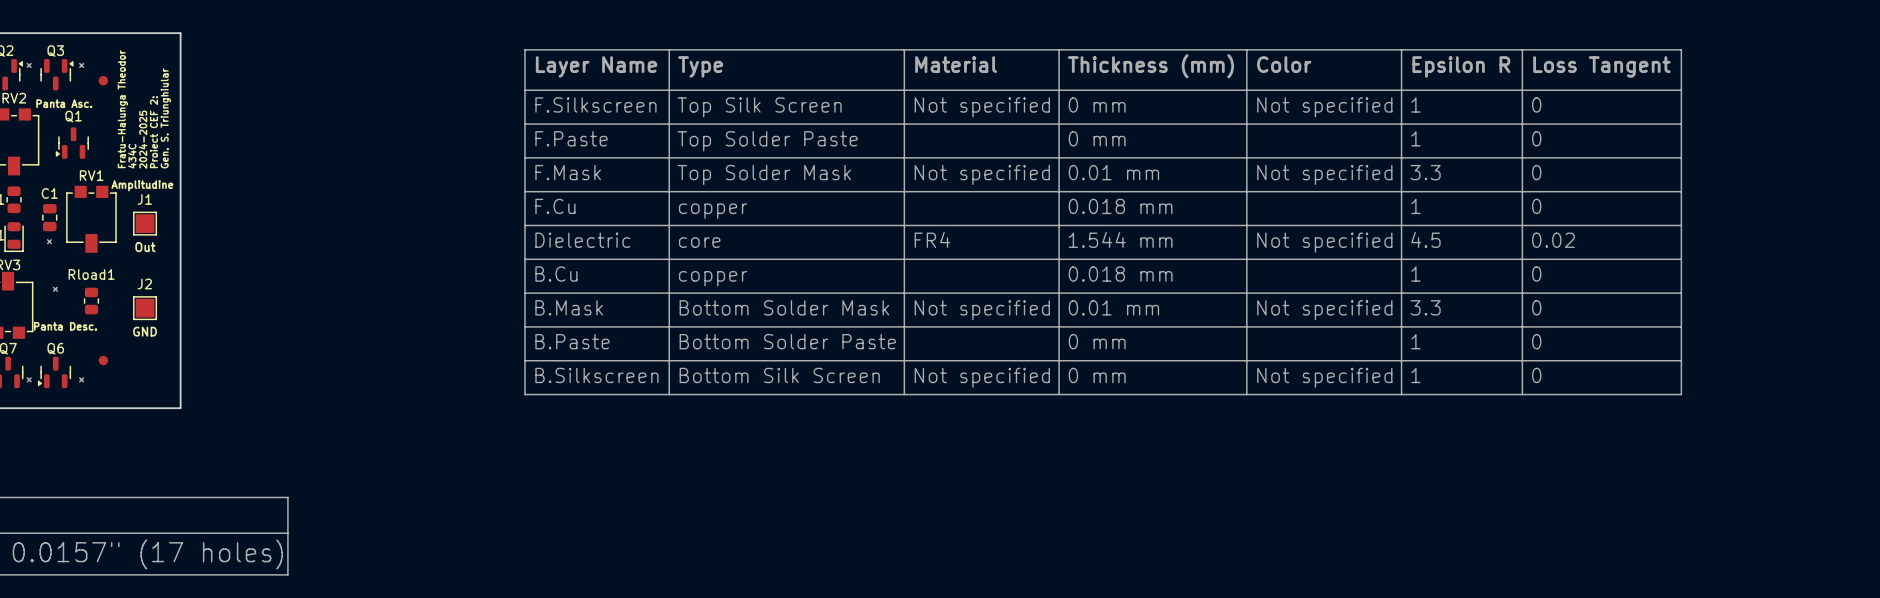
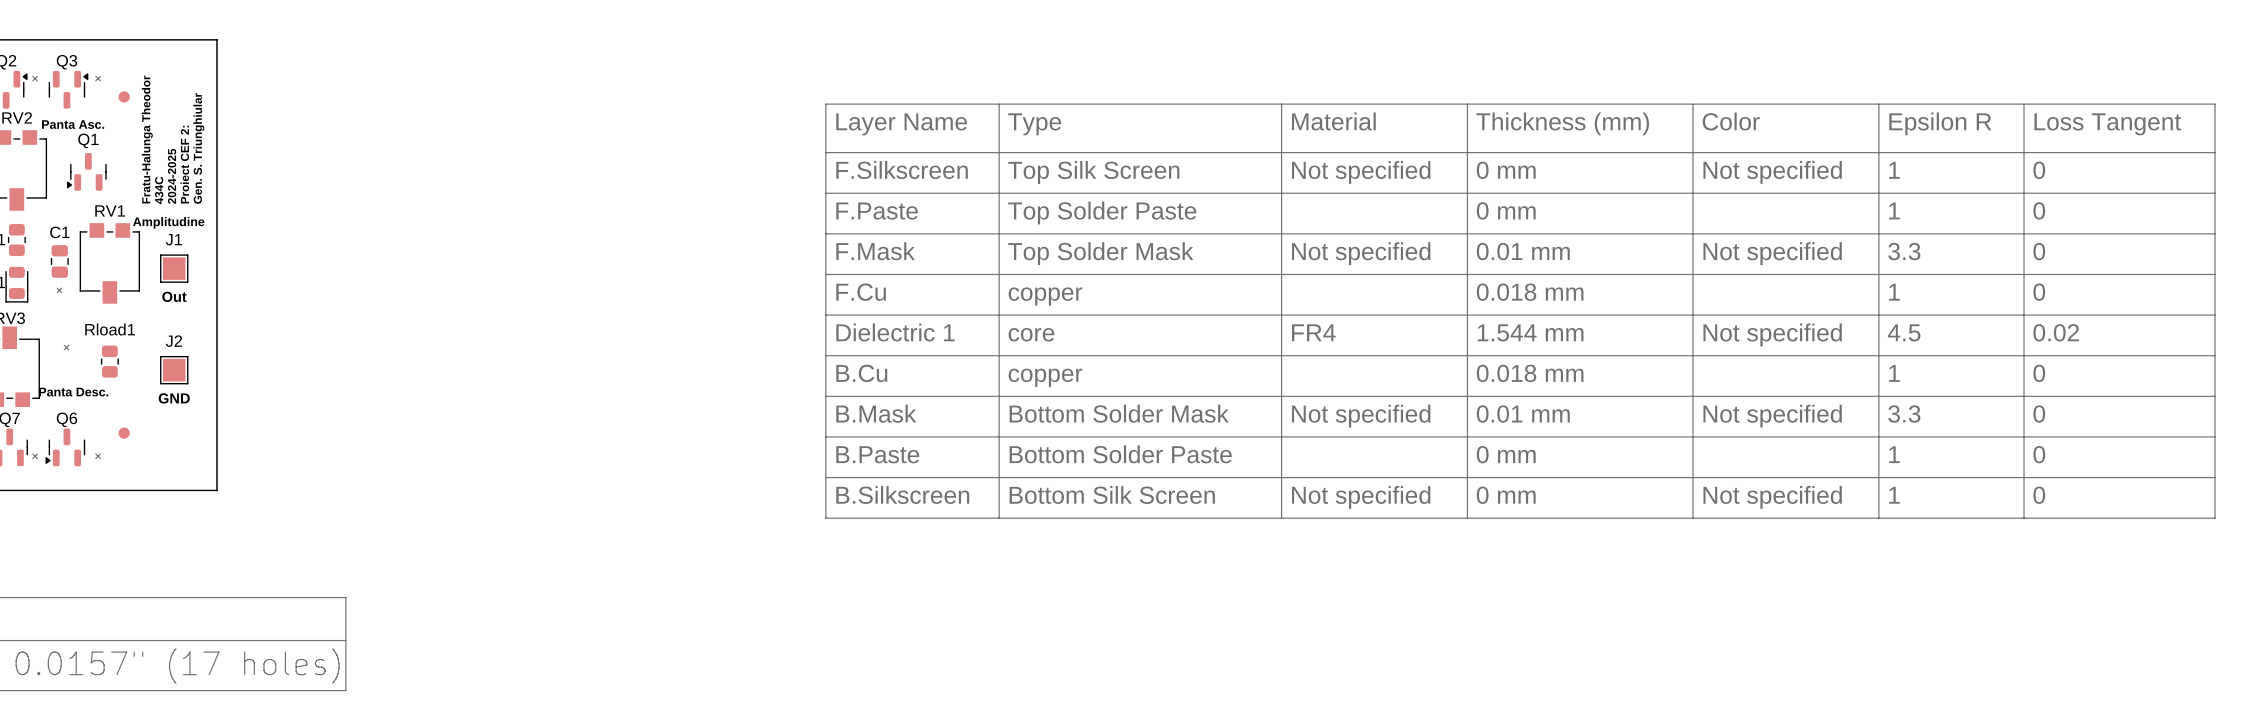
line: (525, 49) (525, 394) (1681, 394) (1681, 49) (525, 49) -> (825, 104) (825, 518) (2215, 518) (2215, 104) (825, 104)
line: (669, 49) (669, 394) -> (999, 104) (999, 518)
line: (904, 49) (904, 394) -> (1281, 104) (1281, 518)
line: (1059, 49) (1059, 394) -> (1467, 104) (1467, 518)
line: (1246, 49) (1246, 394) -> (1693, 104) (1693, 518)
line: (1401, 49) (1401, 394) -> (1878, 104) (1878, 518)
line: (1522, 49) (1522, 394) -> (2024, 104) (2024, 518)
text position: Material (956, 64) -> Material (1333, 121)
text position: Color (1284, 64) -> Color (1731, 121)
text position: Layer Name (596, 66) -> Layer Name (901, 124)
text position: Type (700, 66) -> Type (1034, 124)
text position: Thickness (mm) (1150, 66) -> Thickness (mm) (1562, 123)
text position: Epsilon R (1461, 66) -> Epsilon R (1940, 123)
text position: Loss Tangent (1601, 66) -> Loss Tangent (2107, 124)
line: (525, 90) (1681, 90) -> (825, 152) (2215, 152)
text position: F.Silkscreen (595, 104) -> F.Silkscreen (902, 170)
text: 0 mm (1097, 104) -> none
text: 1 (1415, 104) -> none
text: 0 (1536, 104) -> none
text position: Top Silk Screen (759, 107) -> Top Silk Screen (1093, 172)
text: Not specified (982, 107) -> none
text: Not specified (1324, 107) -> none
line: (525, 124) (1681, 124) -> (825, 193) (2215, 193)
text position: F.Paste (571, 138) -> F.Paste (877, 211)
text: 0 mm (1097, 138) -> Not specified (1361, 172)
text: 1 (1415, 138) -> Not specified (1772, 172)
text: 0 (1536, 138) -> none
text position: Top Solder Paste (767, 141) -> Top Solder Paste (1102, 213)
text: none -> 0 mm (1506, 170)
text: none -> 1 (1894, 170)
text: none -> 0 (2039, 170)
line: (525, 157) (1681, 157) -> (825, 233) (2215, 233)
text position: F.Mask (568, 172) -> F.Mask (875, 251)
text: 0.01 mm (1113, 172) -> none
text: 3.3 (1425, 172) -> none
text: 0 (1536, 172) -> none
text position: Top Solder Mask (764, 174) -> Top Solder Mask (1100, 253)
text: Not specified (982, 174) -> none
text: Not specified (1324, 174) -> none
text: none -> 0 mm (1506, 210)
text: none -> 1 (1894, 210)
text: none -> 0 (2039, 210)
line: (525, 191) (1681, 191) -> (825, 274) (2215, 274)
text position: F.Cu (555, 206) -> F.Cu (861, 292)
text: 0.018 mm (1120, 206) -> Not specified (1361, 253)
text: 1 (1415, 206) -> Not specified (1772, 253)
text: 0 (1536, 206) -> none
text: none -> 0.01 mm (1523, 251)
text: none -> 3.3 (1904, 251)
text: none -> 0 (2039, 251)
text: copper (713, 211) -> none
line: (525, 225) (1681, 225) -> (825, 315) (2215, 315)
text position: FR4 (932, 239) -> FR4 (1313, 332)
text position: 1.544 mm (1120, 239) -> 1.544 mm (1530, 332)
text position: 4.5 (1425, 239) -> 4.5 (1904, 332)
text: Dielectric (582, 240) -> none
text position: 0.02 (1553, 240) -> 0.02 (2056, 332)
text position: core (699, 242) -> core (1031, 334)
text: Not specified (1324, 242) -> none
text: none -> 0.018 mm (1530, 292)
text: none -> 1 (1894, 292)
text: none -> 0 (2039, 292)
text: none -> copper (1045, 296)
line: (525, 259) (1681, 259) -> (825, 355) (2215, 355)
text position: B.Cu (556, 274) -> B.Cu (861, 373)
text: 0.018 mm (1120, 274) -> none
text: 1 (1415, 274) -> Not specified (1772, 334)
text: 0 (1536, 274) -> none
text: none -> Dielectric 1 (895, 332)
text: copper (713, 278) -> none
line: (525, 293) (1681, 293) -> (825, 396) (2215, 396)
text position: B.Mask (569, 307) -> B.Mask (876, 413)
text position: Bottom Solder Mask (784, 307) -> Bottom Solder Mask (1119, 413)
text: 0.01 mm (1113, 307) -> none
text: 3.3 (1425, 307) -> none
text: 0 (1536, 307) -> none
text: Not specified (982, 310) -> none
text: none -> 0.018 mm (1530, 373)
text: Not specified (1324, 310) -> none
text: none -> 1 (1894, 373)
text: none -> 0 (2039, 373)
text: none -> copper (1045, 377)
line: (525, 326) (1681, 326) -> (825, 436) (2215, 436)
text position: B.Paste (572, 341) -> B.Paste (877, 454)
text position: Bottom Solder Paste (787, 341) -> Bottom Solder Paste (1120, 454)
text: 0 mm (1097, 341) -> Not specified (1361, 416)
text: 1 (1415, 341) -> Not specified (1772, 416)
text: 0 (1536, 341) -> none
text: none -> 0.01 mm (1523, 414)
text: none -> 3.3 (1904, 414)
text: none -> 0 (2039, 414)
line: (525, 360) (1681, 360) -> (825, 477) (2215, 477)
text position: B.Silkscreen (596, 375) -> B.Silkscreen (902, 494)
text position: Bottom Silk Screen (779, 375) -> Bottom Silk Screen (1112, 494)
text: 0 mm (1097, 375) -> none
text: 1 (1415, 375) -> none
text: 0 (1536, 375) -> none
text: Not specified (982, 377) -> none
text: Not specified (1324, 377) -> none
text: none -> 0 mm (1506, 454)
text: none -> 1 (1894, 454)
text: none -> 0 (2039, 454)
text: none -> 0 mm (1506, 495)
text: none -> 1 (1894, 495)
text: none -> 0 (2039, 495)
text: none -> Not specified (1361, 497)
text: none -> Not specified (1772, 497)

